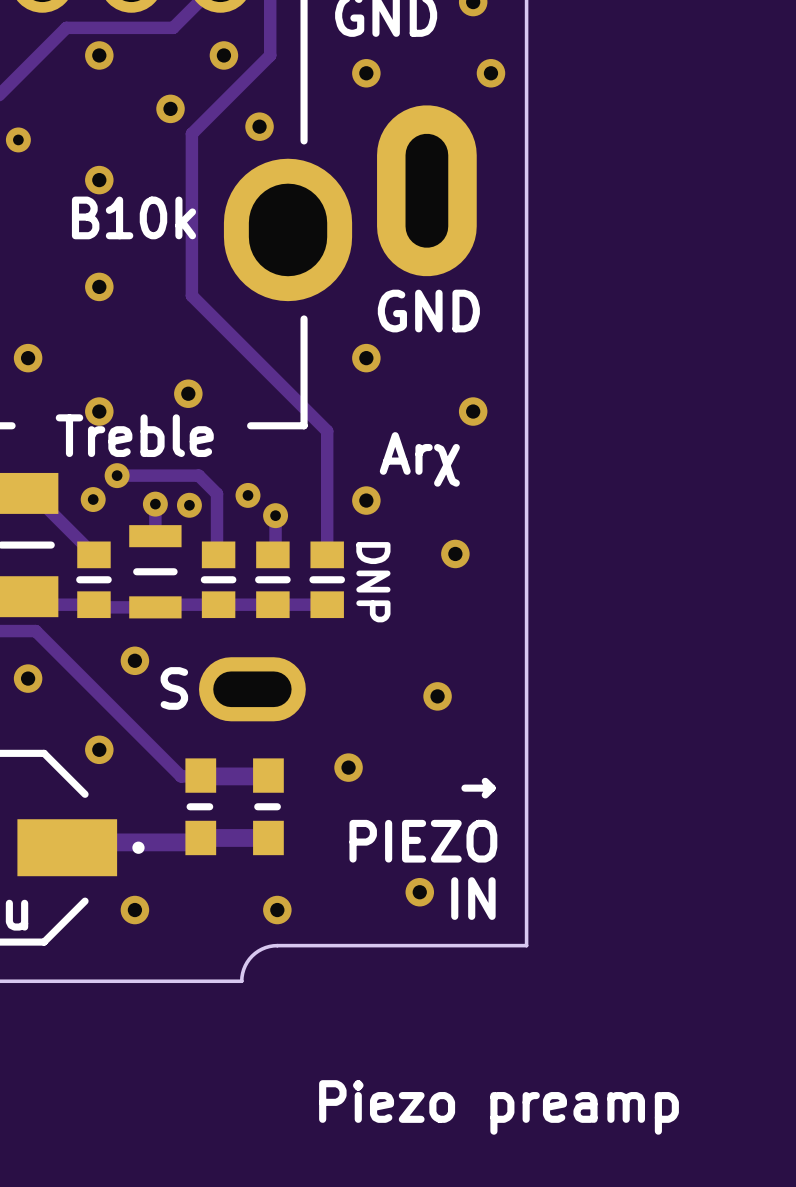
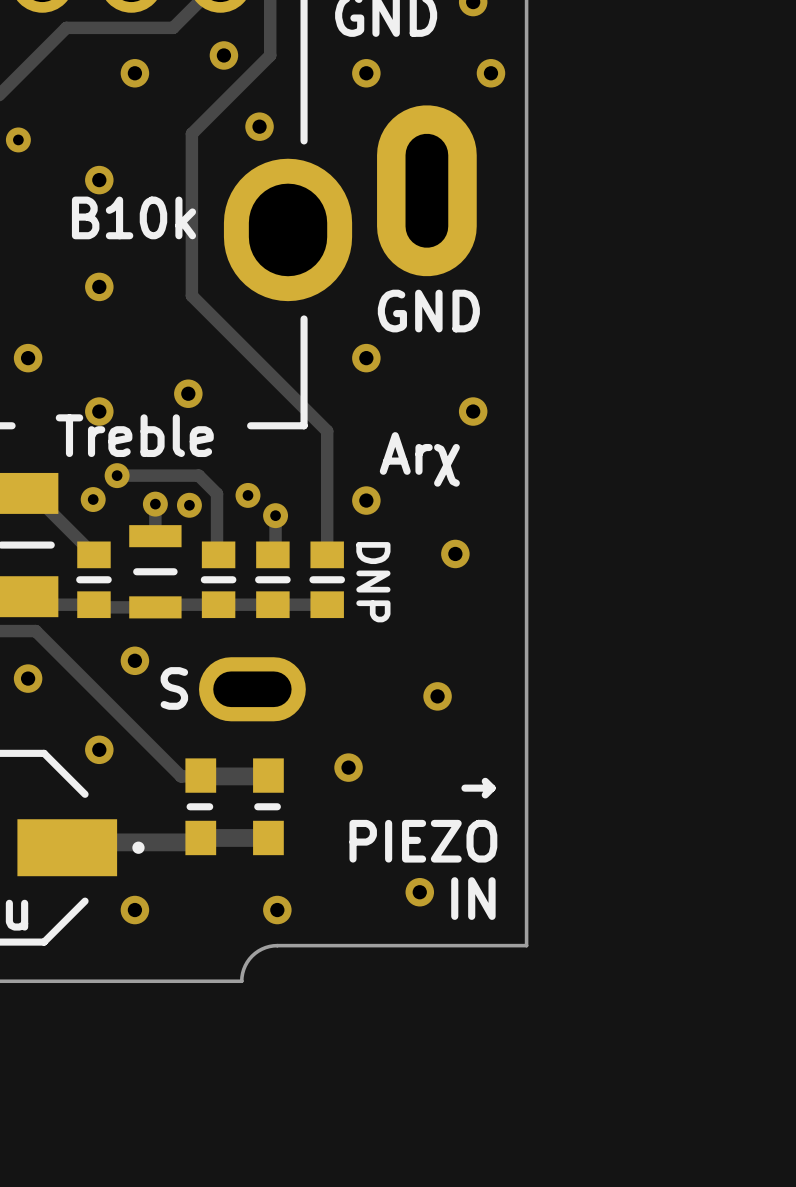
via: (99, 55) -> none
via: none -> (134, 73)
via: (170, 108) -> none
text: Piezo preamp (499, 1107) -> none

